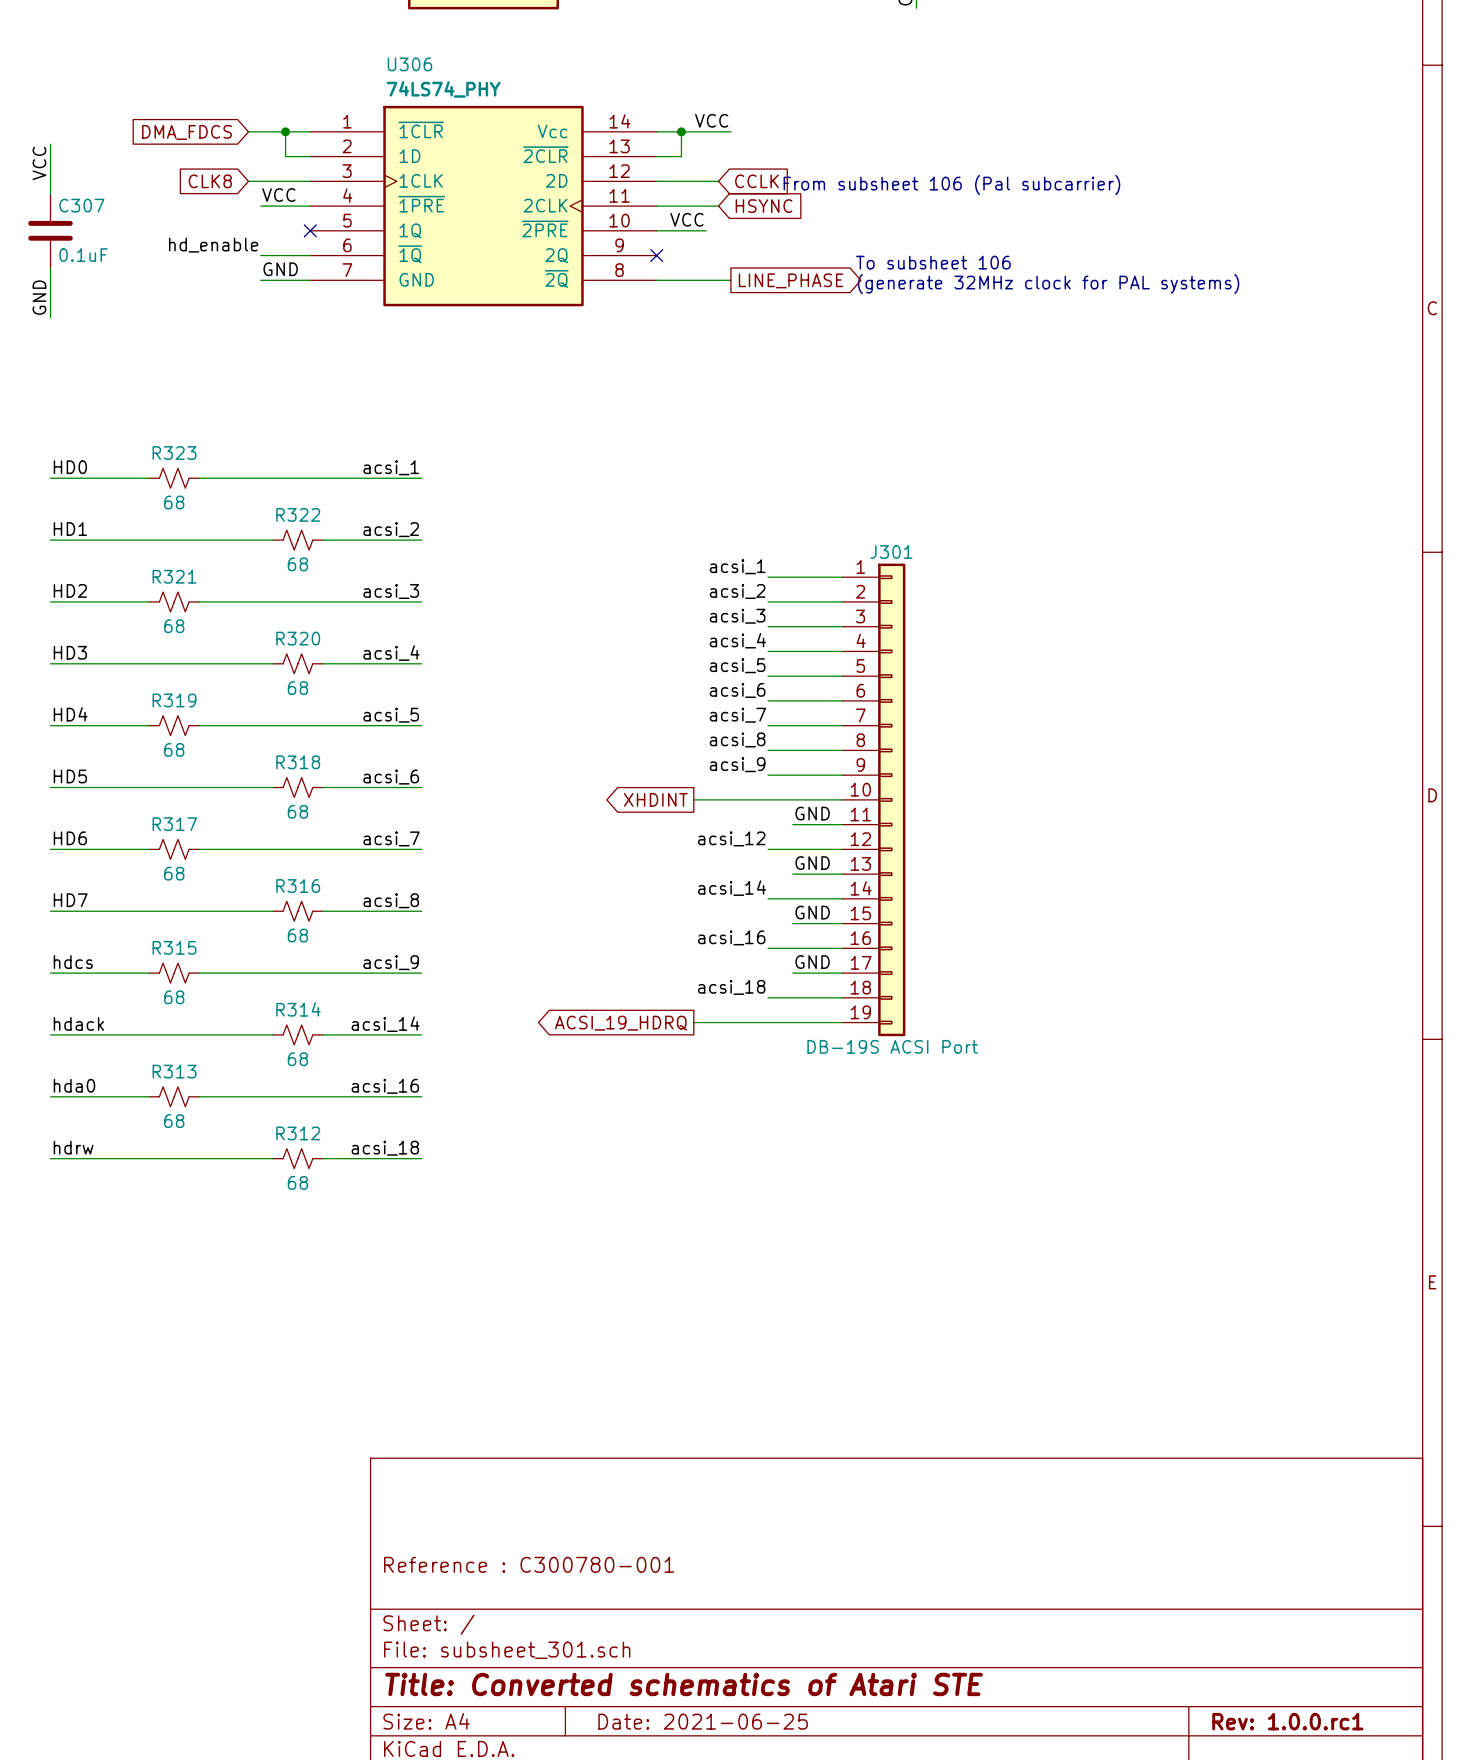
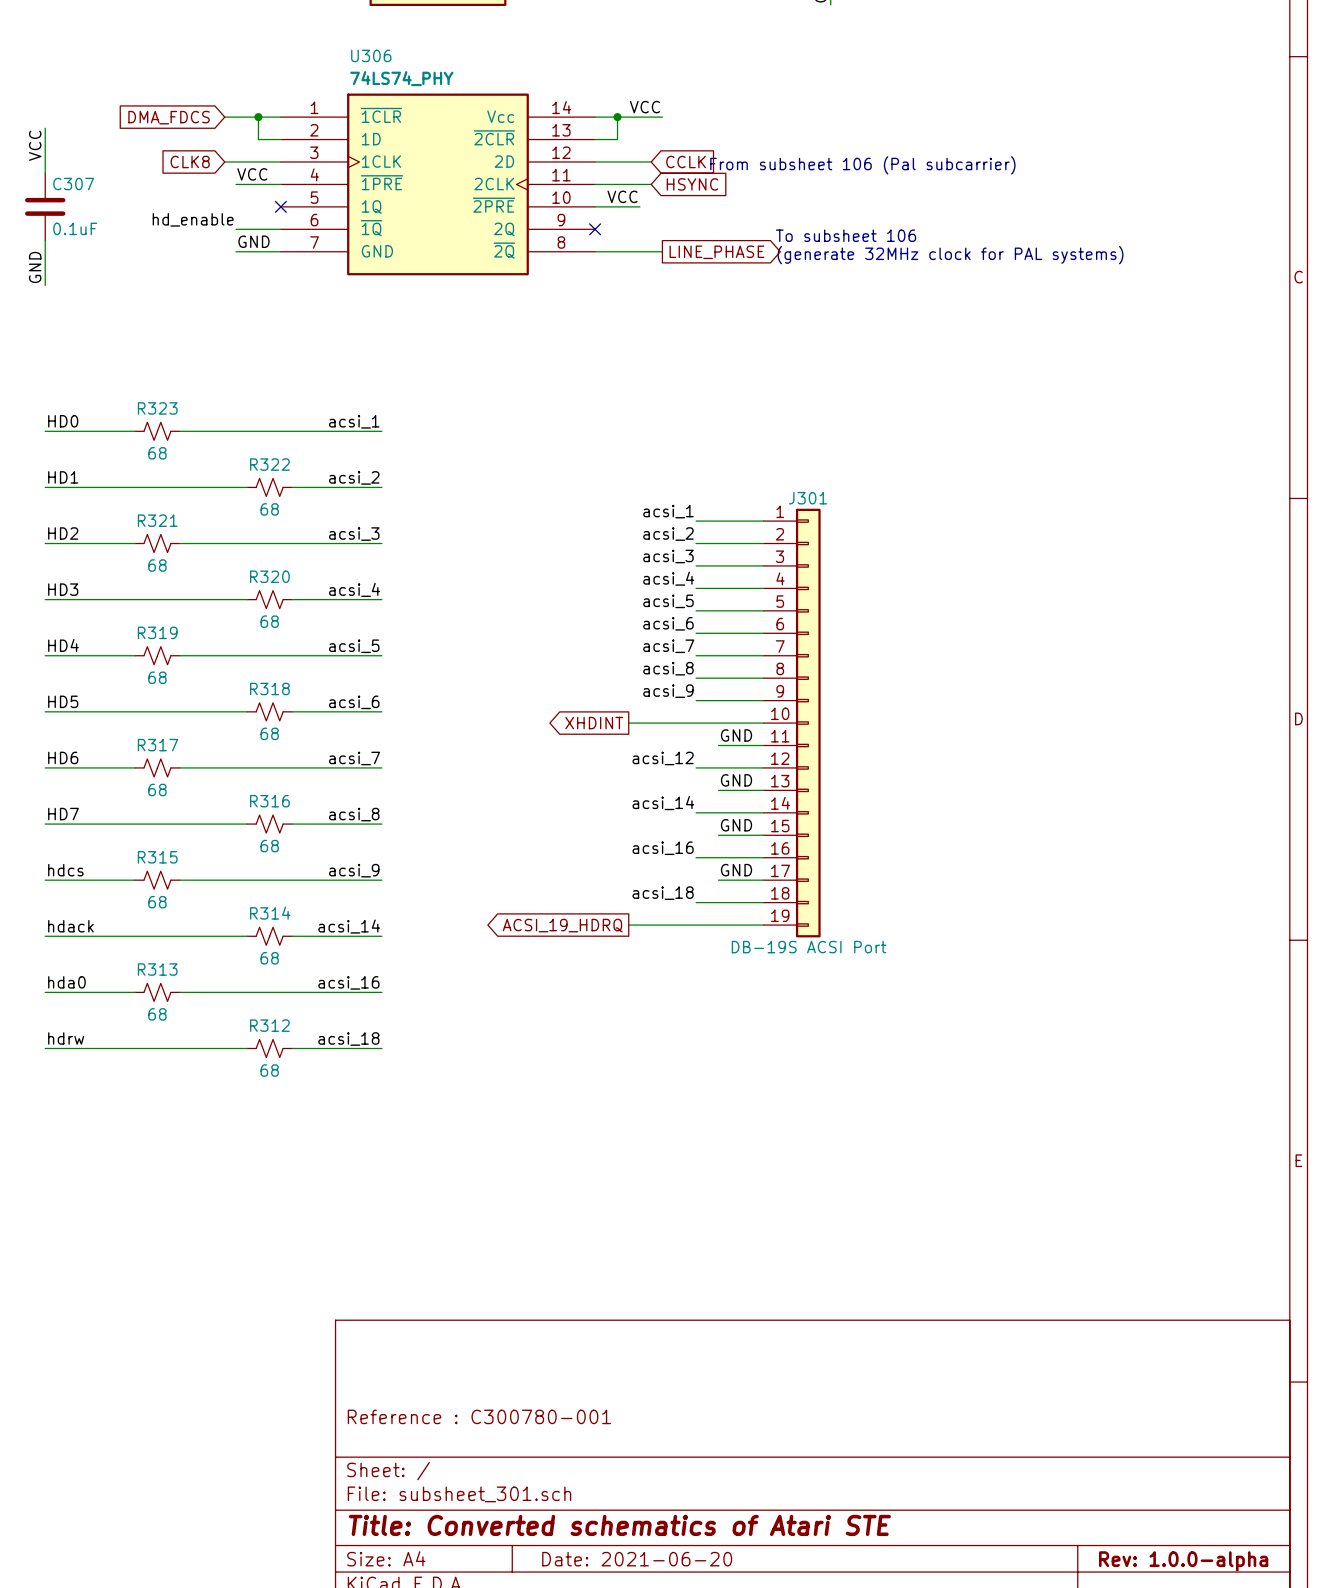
title block: Date: 2021-06-25 (703, 1721) -> Date: 2021-06-20 (637, 1559)
title block: Rev: 1.0.0.rc1 (1287, 1721) -> Rev: 1.0.0-alpha (1183, 1561)

